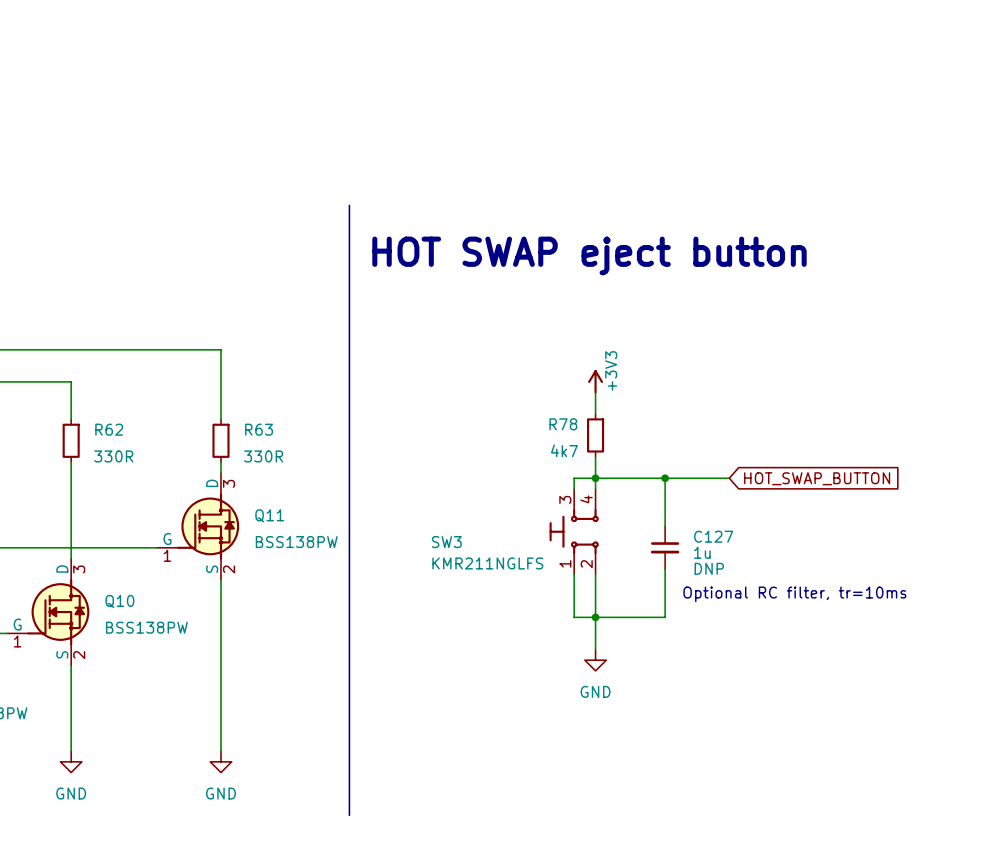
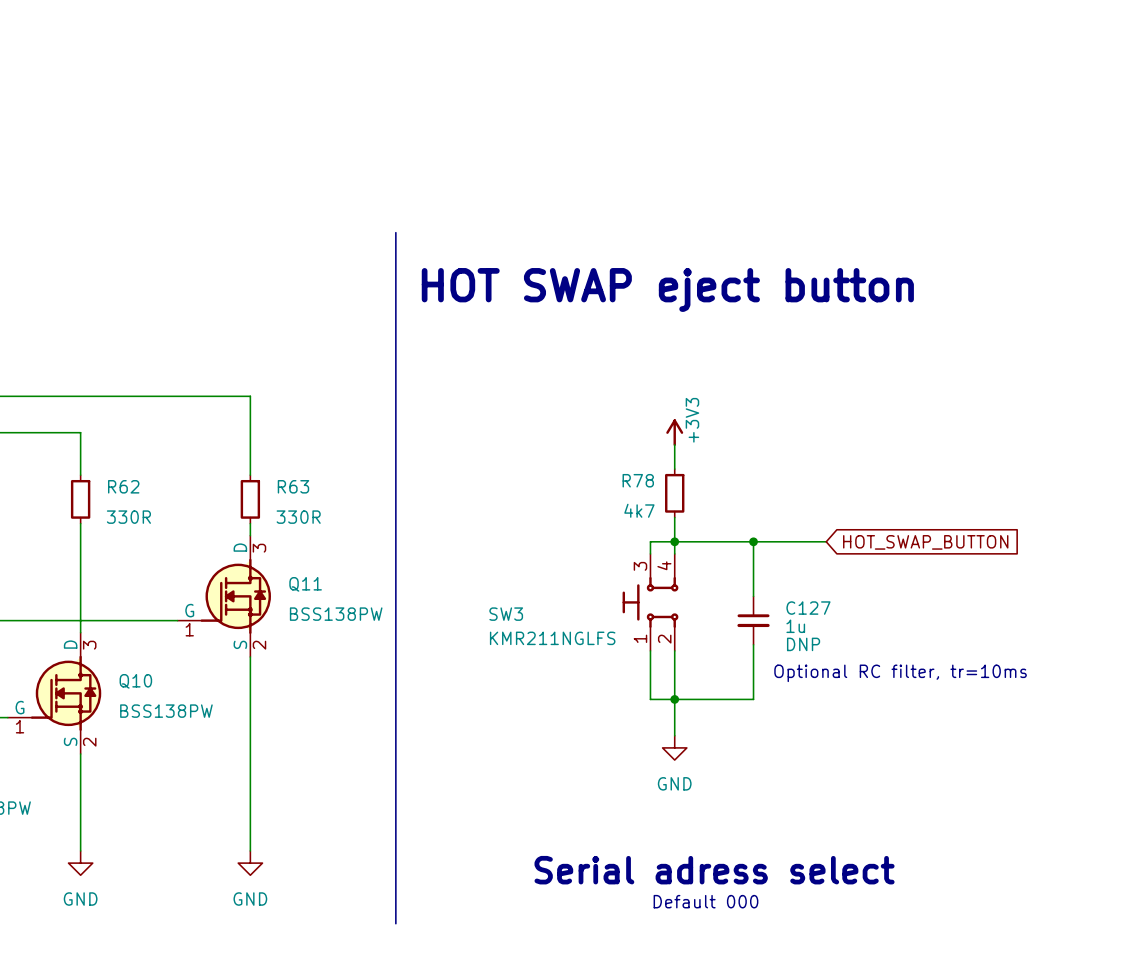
text: none -> Serial adress select (714, 870)
text: none -> Default 000 (705, 901)

